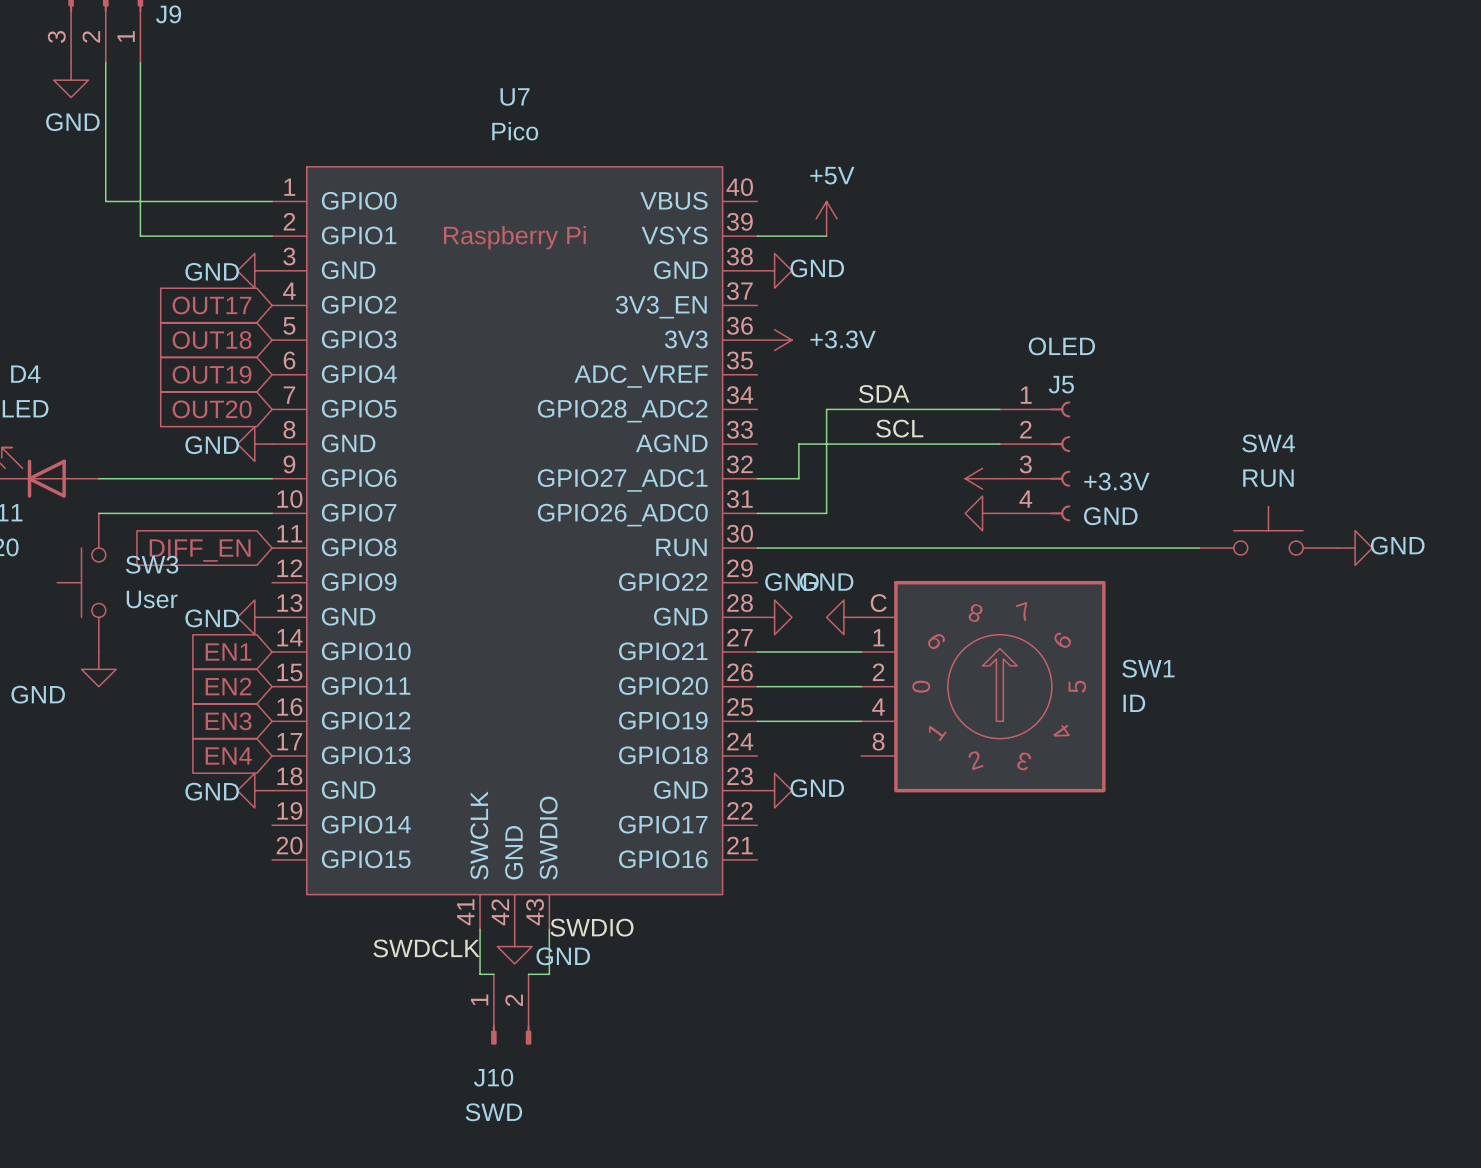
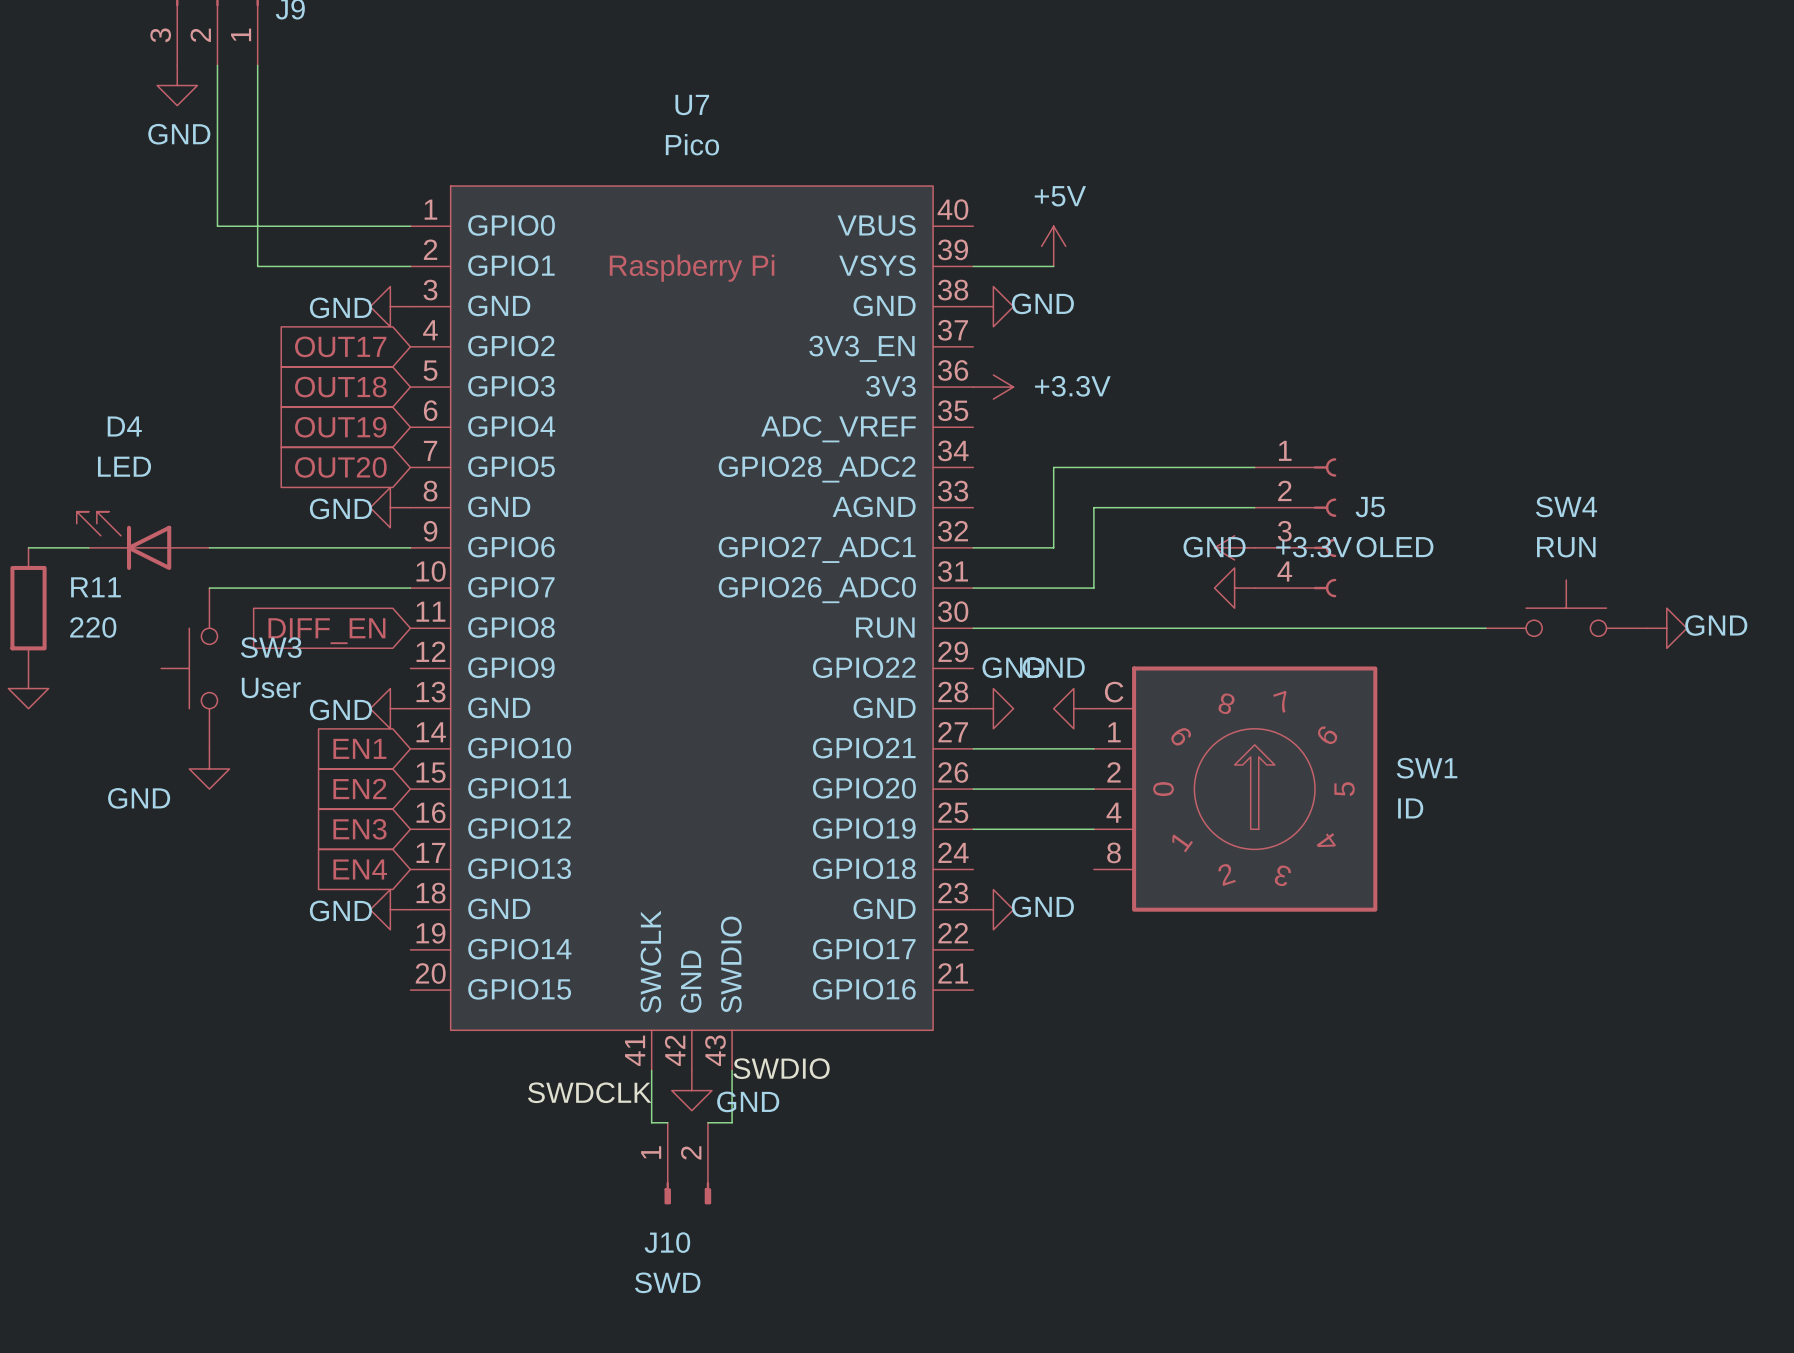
J5 value position: OLED (1061, 346) -> OLED (1394, 547)
J5 name position: J5 (1061, 384) -> J5 (1370, 507)
label: SDA (884, 393) -> none
label: SCL (899, 428) -> none
wire: (861, 444) (798, 444) (798, 478) -> (1093, 507) (1093, 588) (1053, 588)
wire: (826, 478) (826, 513) -> (1053, 547) (1021, 547)
power symbol text position: +3.3V (1116, 481) -> +3.3V (1314, 547)
power symbol text position: GND (1110, 516) -> GND (1214, 547)

